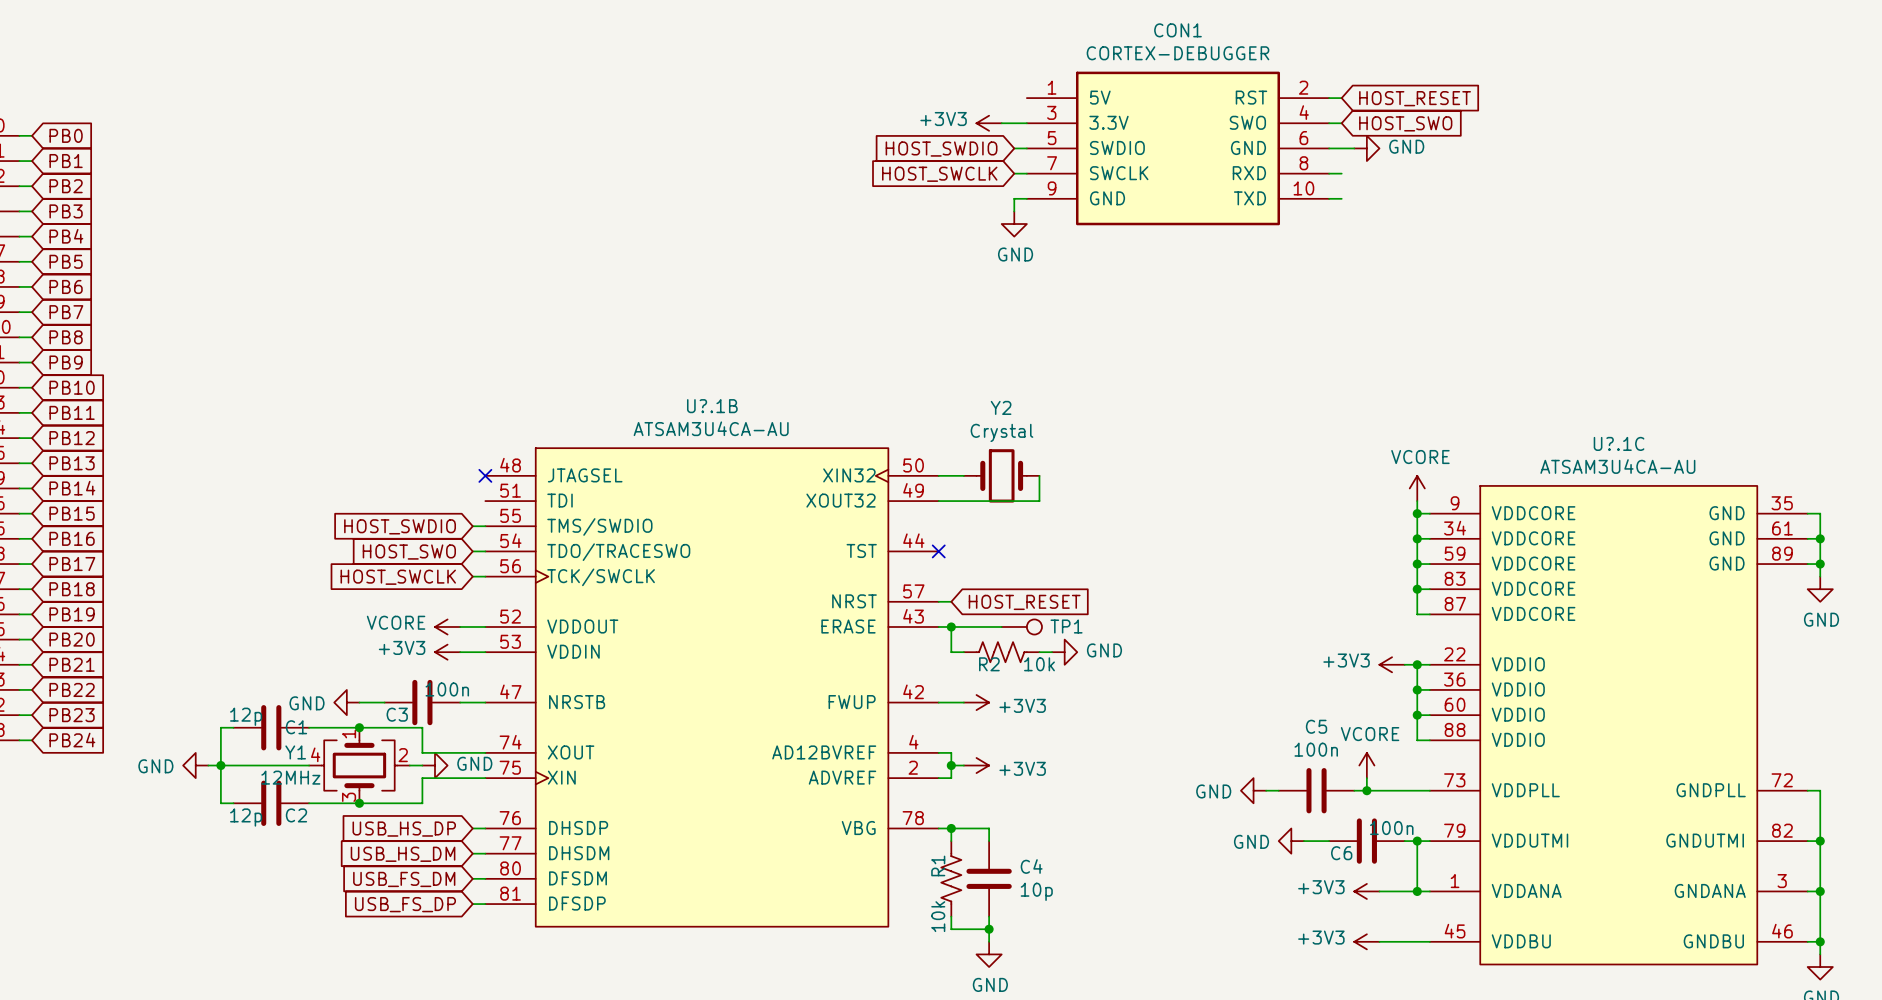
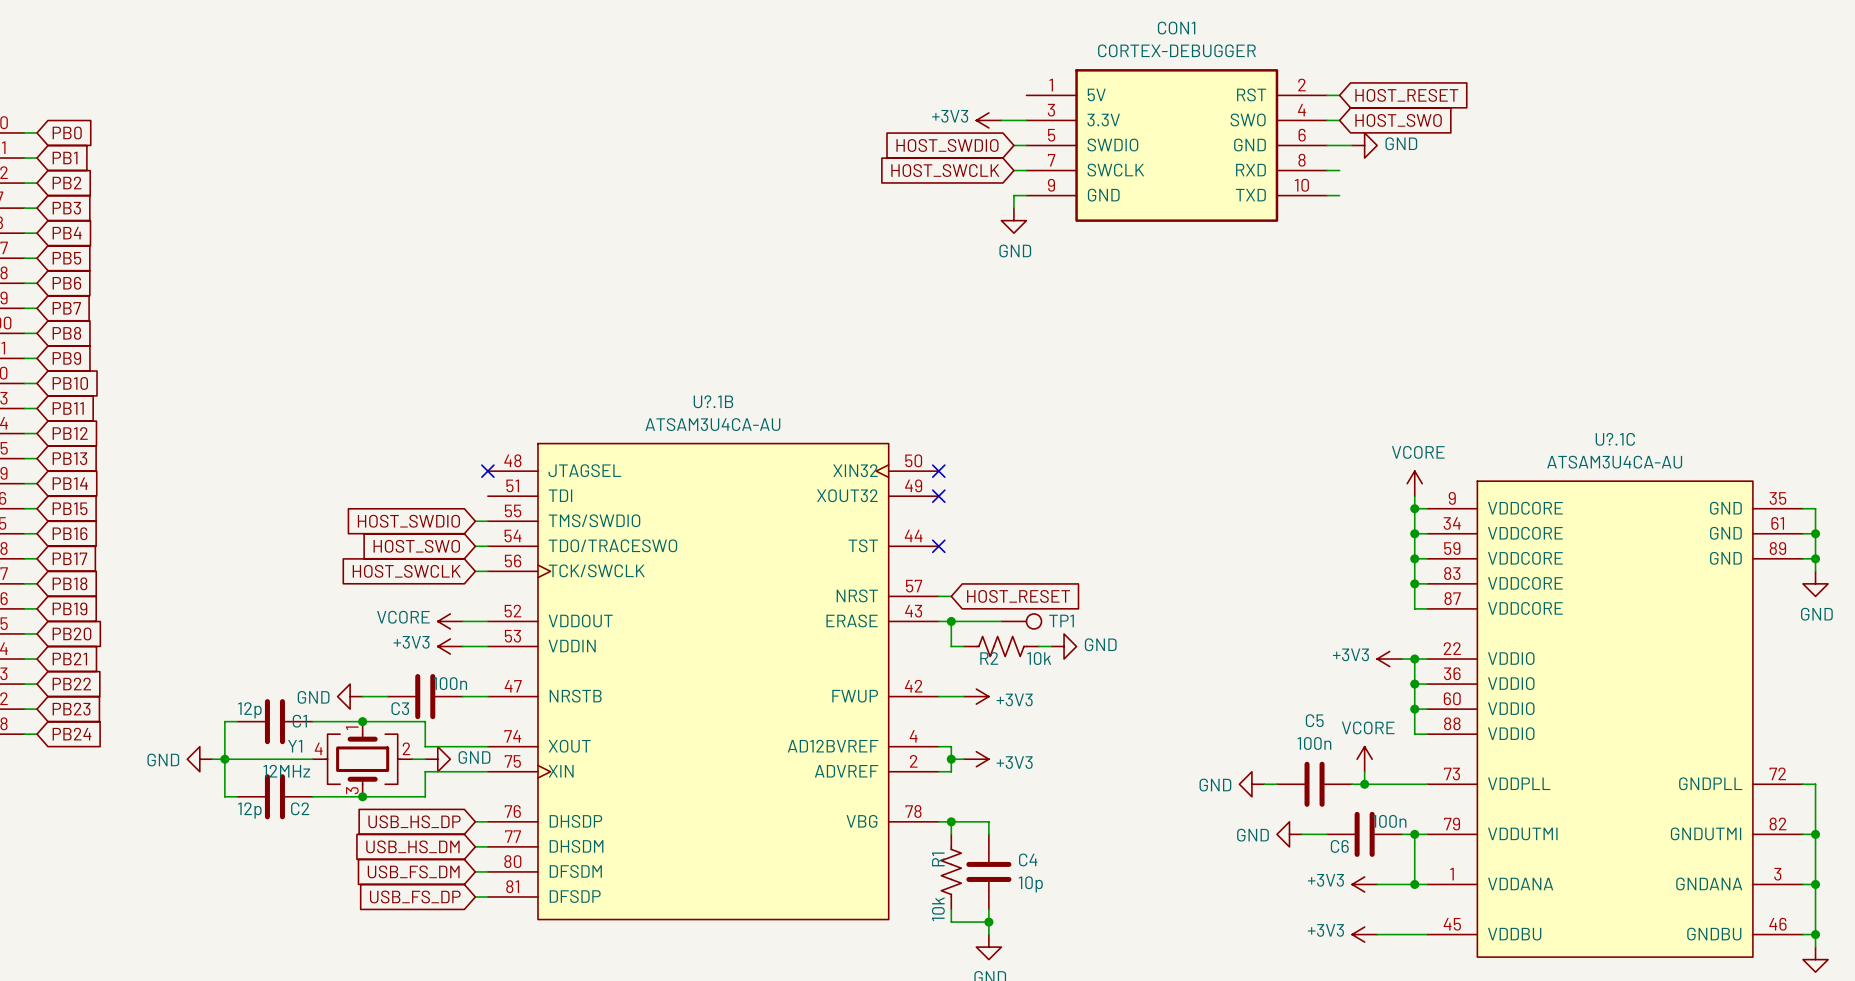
wire: (938, 475) (963, 475) -> none
no-connect mark: none -> (938, 471)
Y2: Crystal (1001, 475) -> none
wire: (1039, 475) (1039, 501) (938, 501) -> none
no-connect mark: none -> (938, 496)

